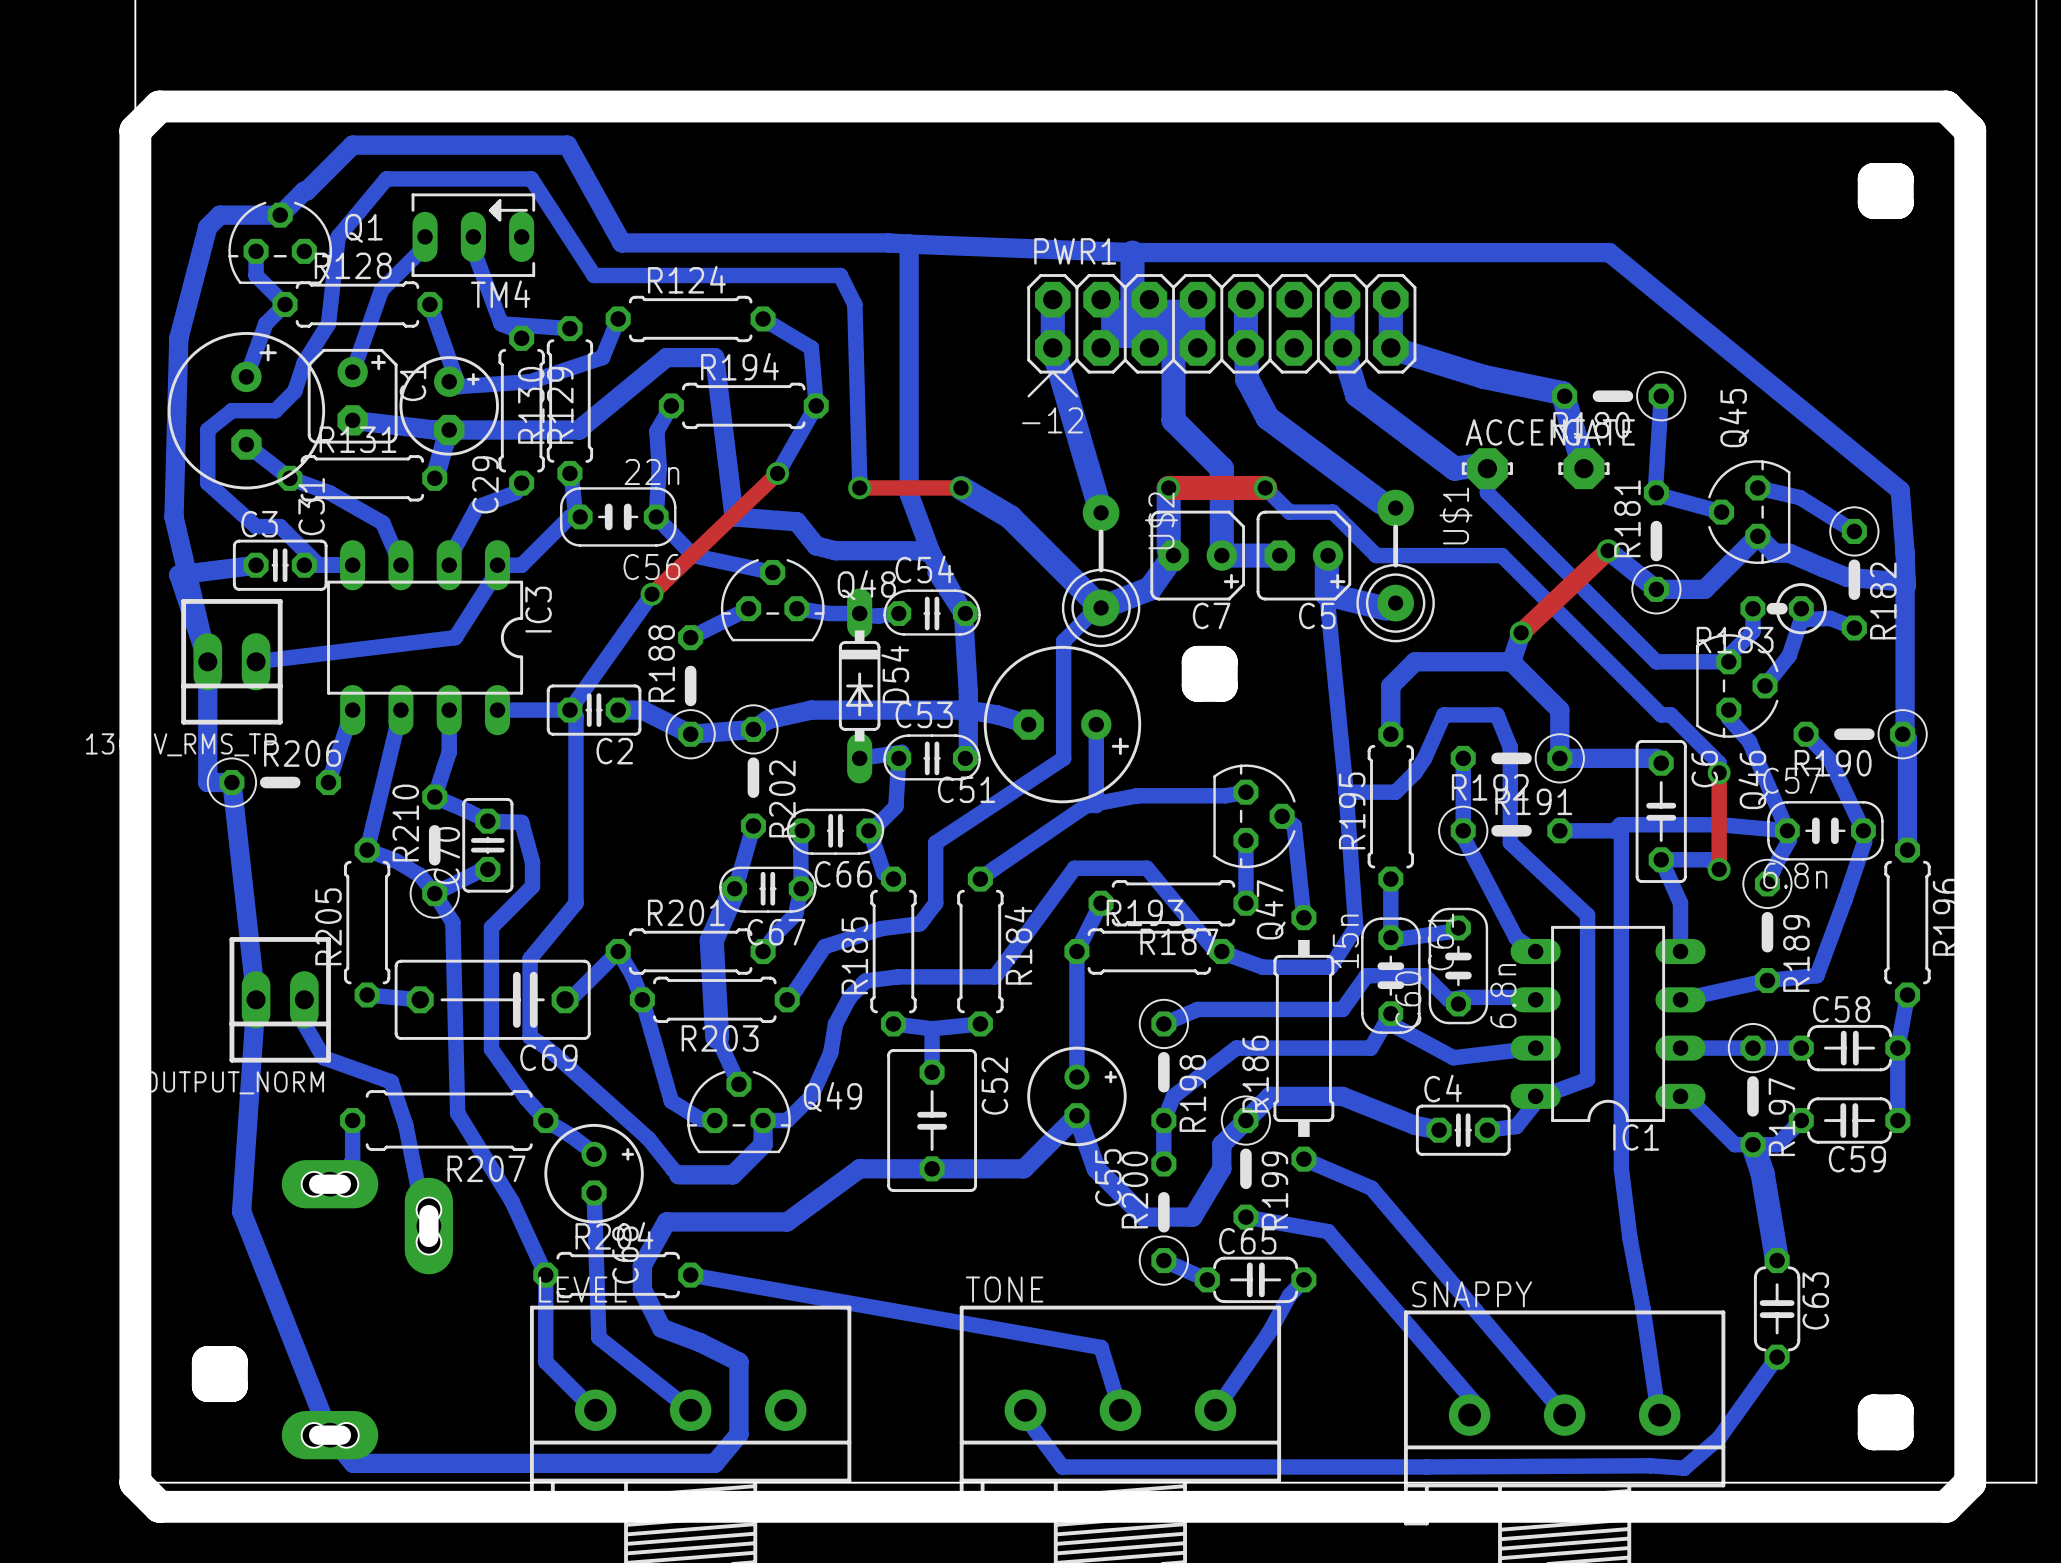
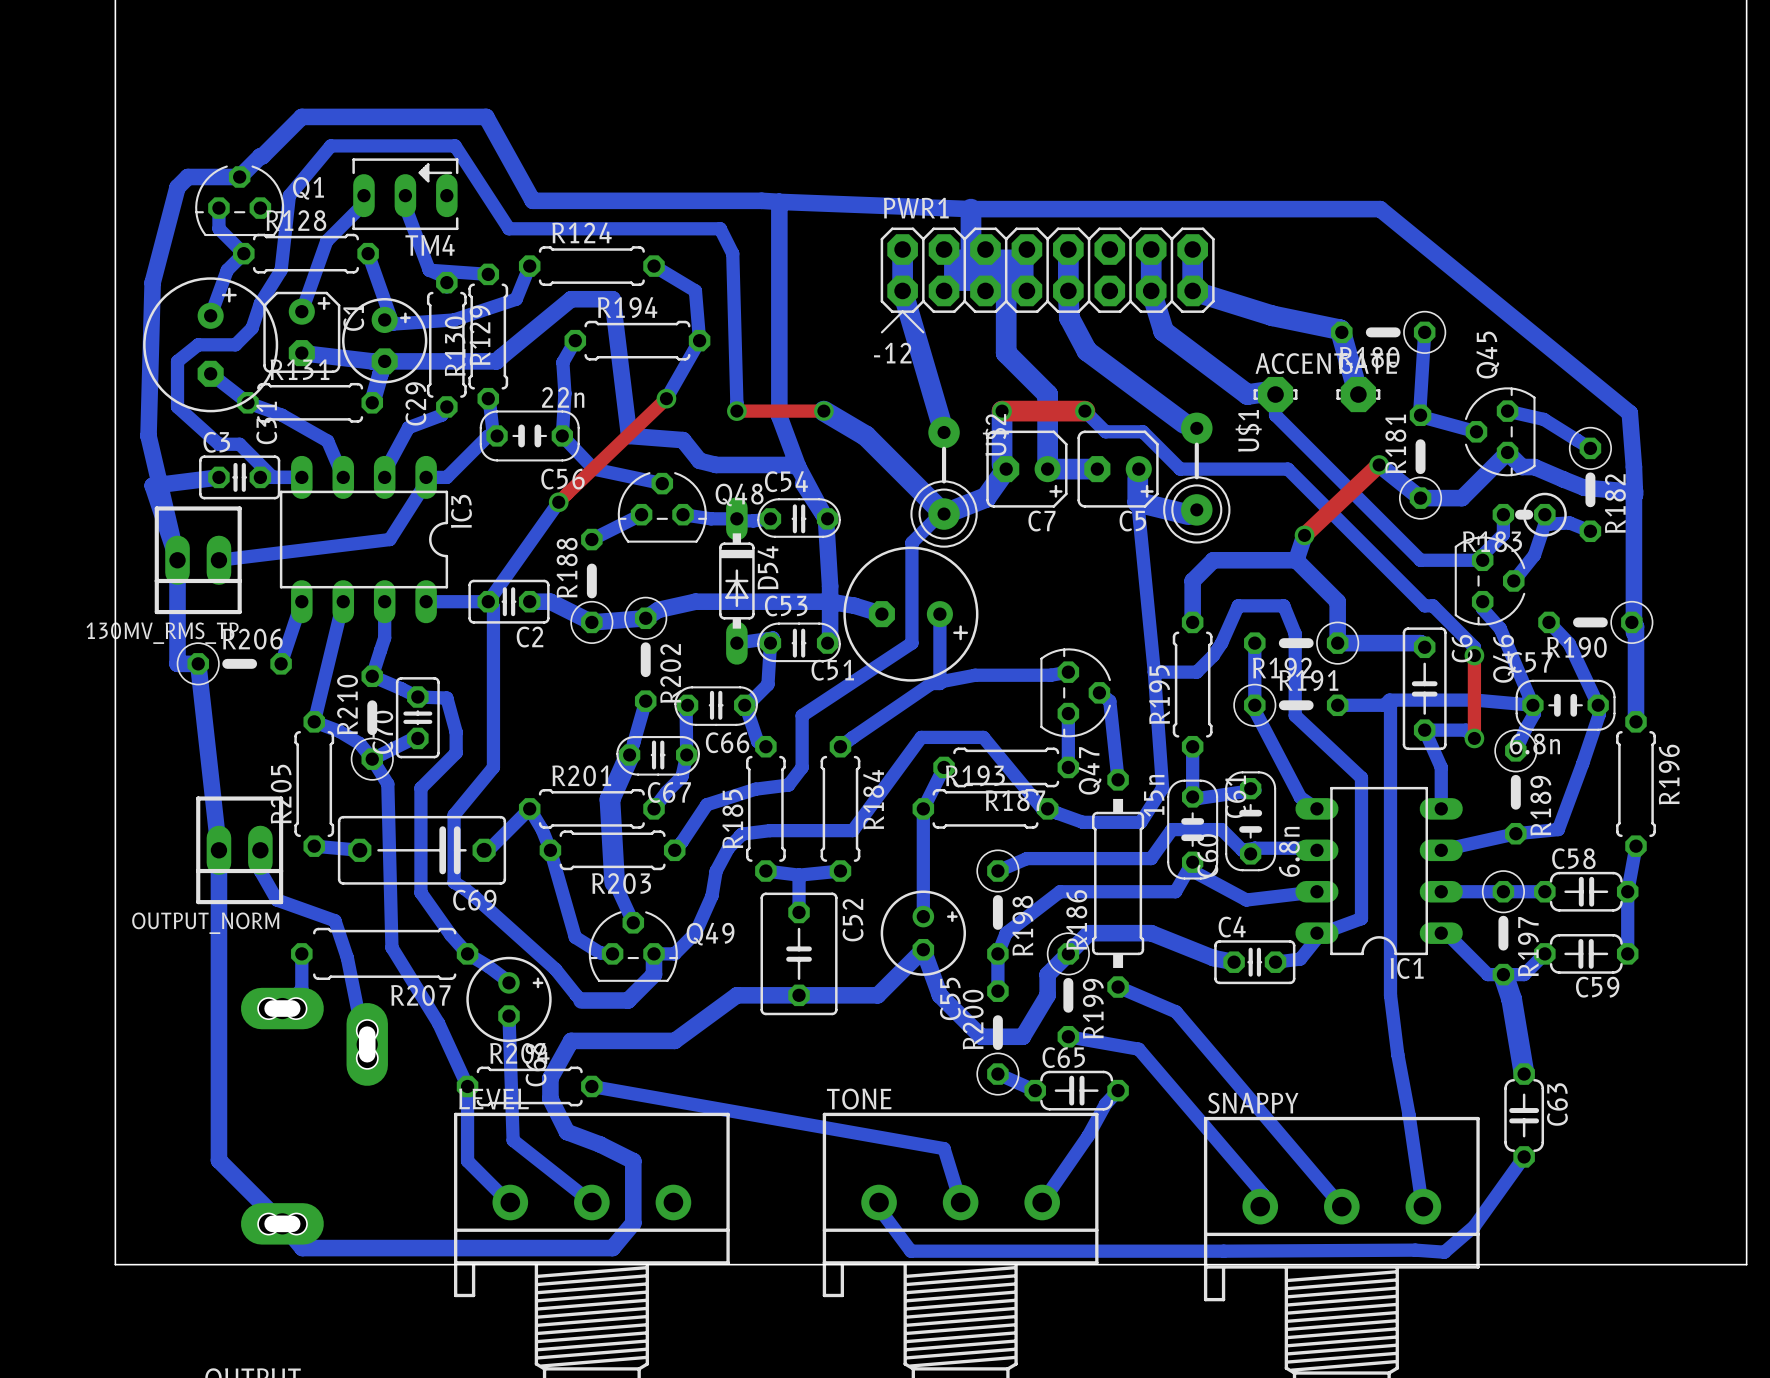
board edge: (159, 106) (1946, 106) (1970, 130) (1970, 1482) (1946, 1506) (159, 1506) (135, 1482) (135, 130) (159, 106) -> none
board edge: (1873, 178) (1873, 203) (1897, 203) (1897, 178) (1873, 178) -> none
board edge: (1197, 661) (1197, 685) (1221, 685) (1221, 661) (1197, 661) -> none
bottom track: (256, 999) (241, 1211) (330, 1435) -> (218, 850) (218, 1160) (282, 1223)
board edge: (207, 1361) (207, 1386) (231, 1386) (231, 1361) (207, 1361) -> none
board edge: (1873, 1410) (1873, 1434) (1897, 1434) (1897, 1410) (1873, 1410) -> none

